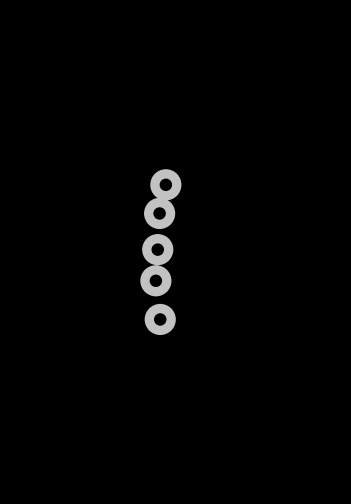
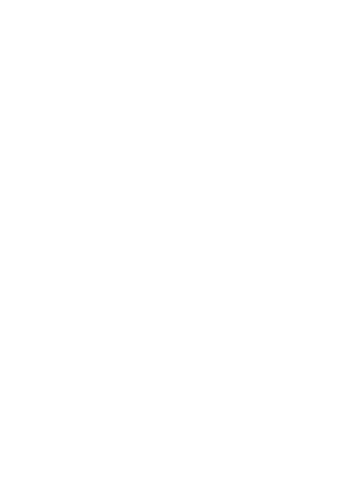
via: (165, 184) -> none
via: (159, 213) -> none
via: (157, 249) -> none
via: (155, 280) -> none
via: (160, 319) -> none

